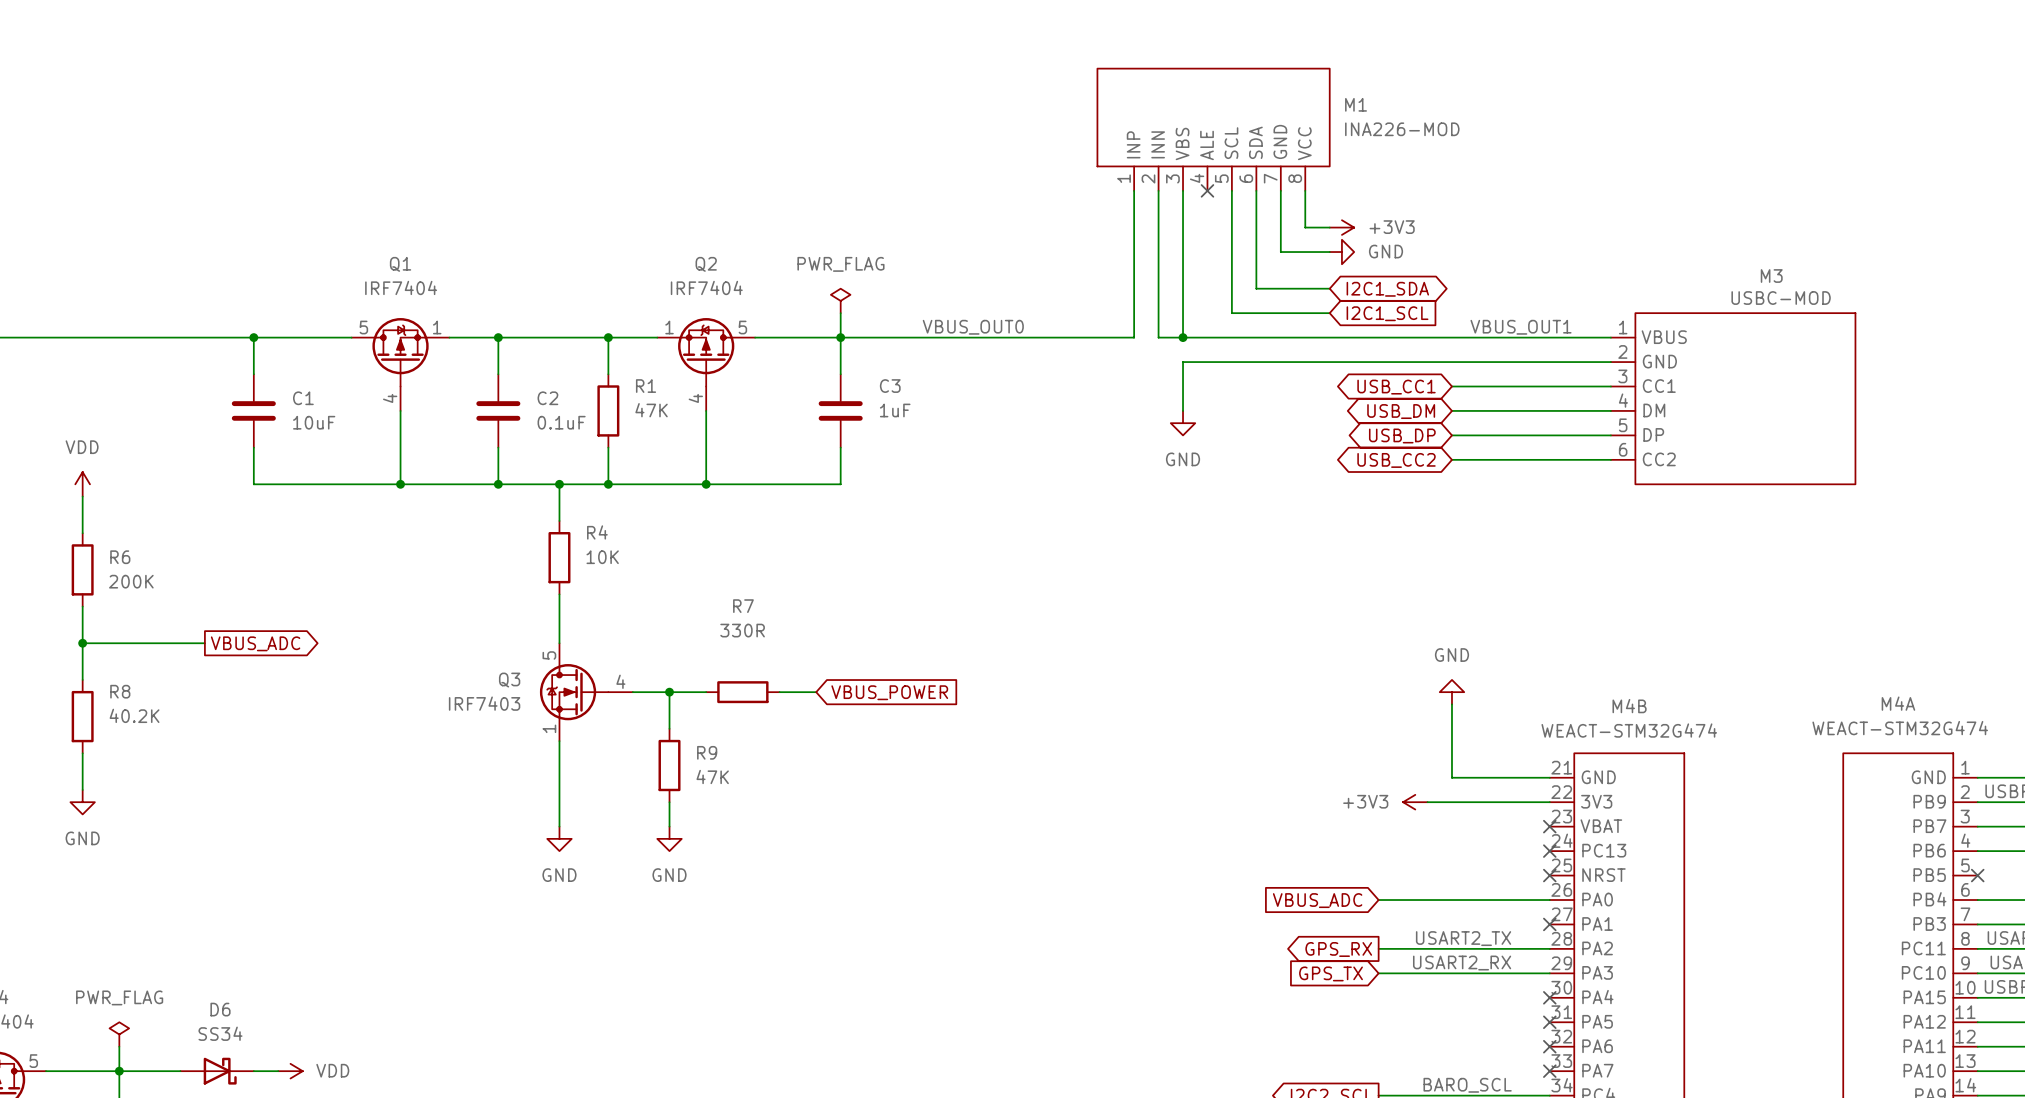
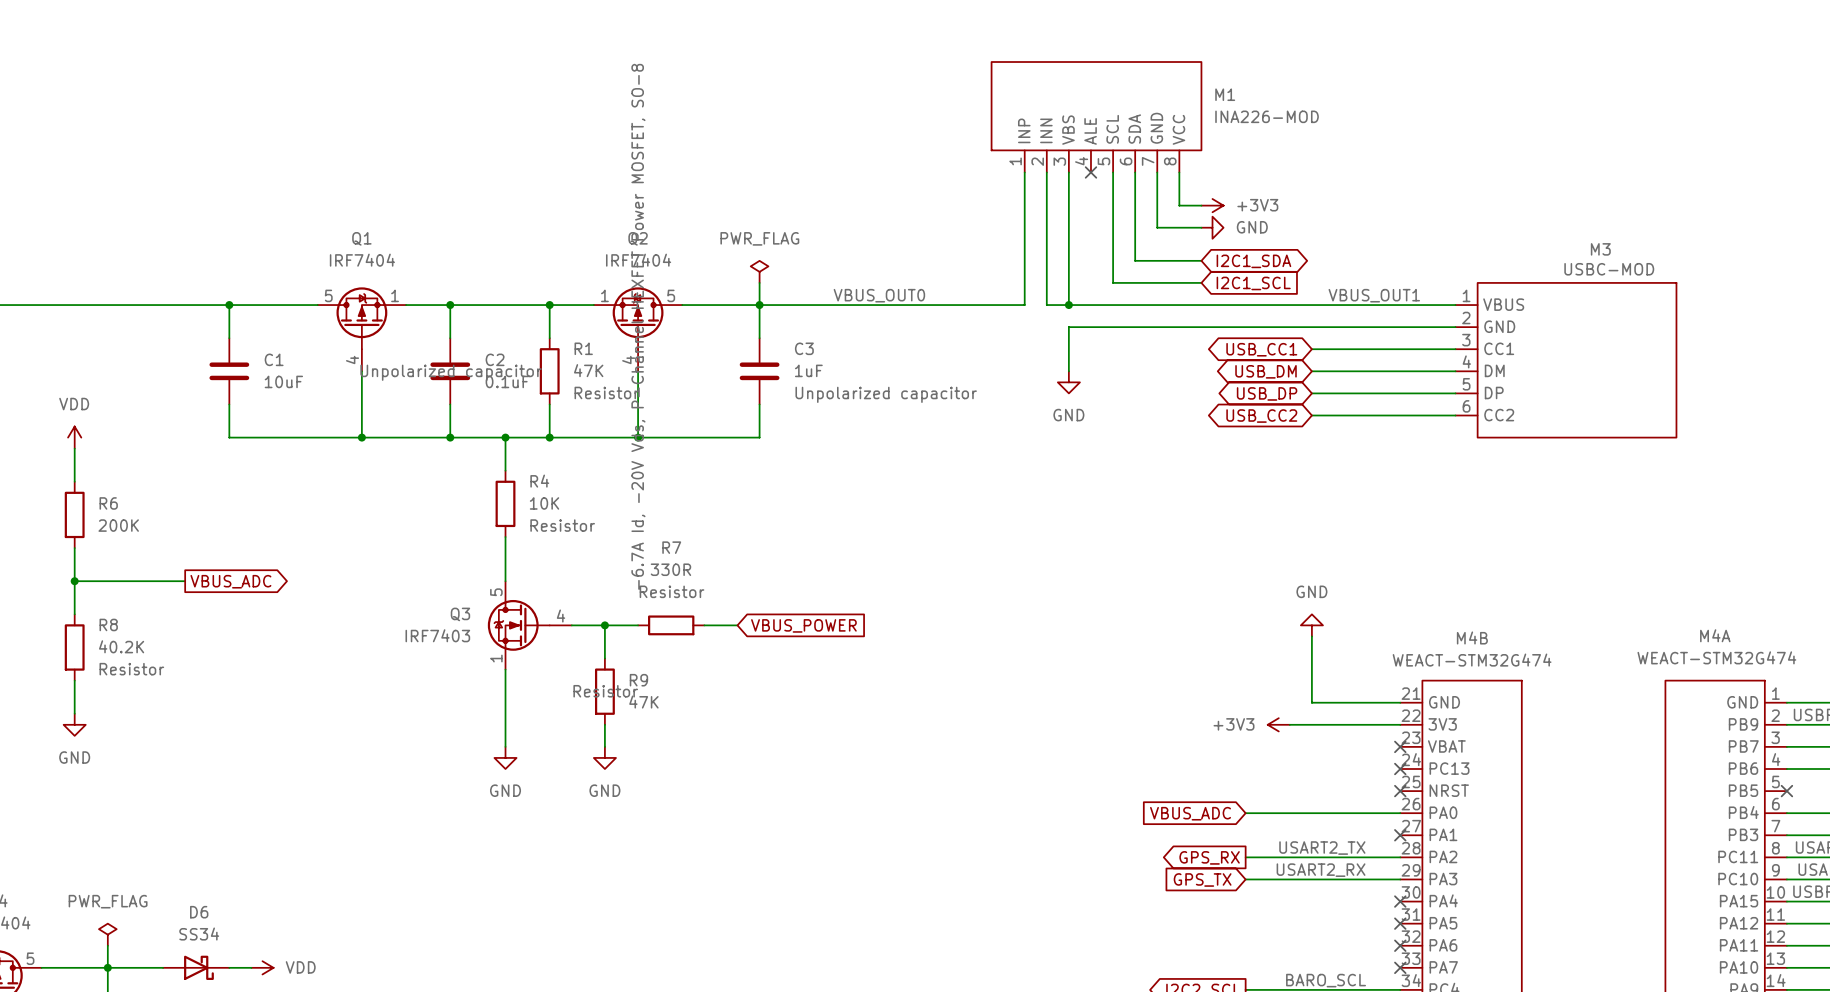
Q2 text: none -> -6.7A Id, -20V Vds, P-Channel HEXFET Power MOSFET, SO-8 (638, 326)
C2 text: none -> Unpolarized capacitor (451, 372)
R1 text: none -> Resistor (606, 392)
C3 text: none -> Unpolarized capacitor (886, 394)
R4 text: none -> Resistor (562, 525)
R7 text: none -> Resistor (672, 591)
R8 text: none -> Resistor (131, 669)
R9 text: none -> Resistor (605, 691)

